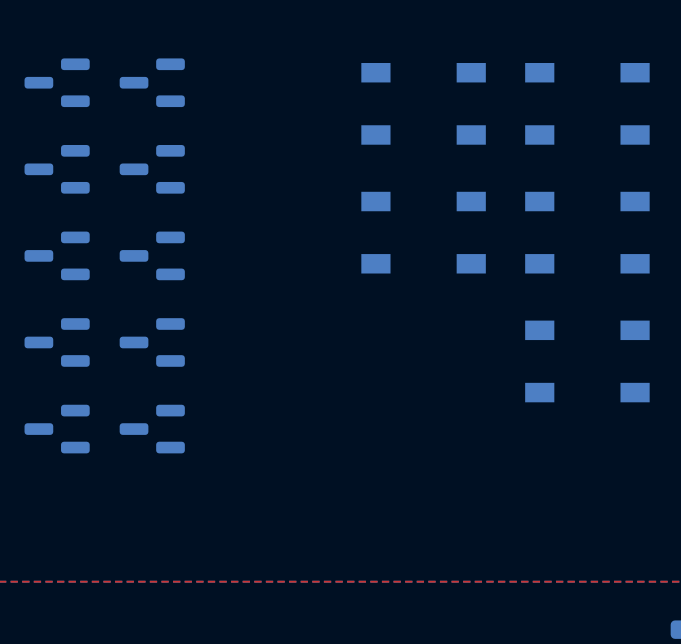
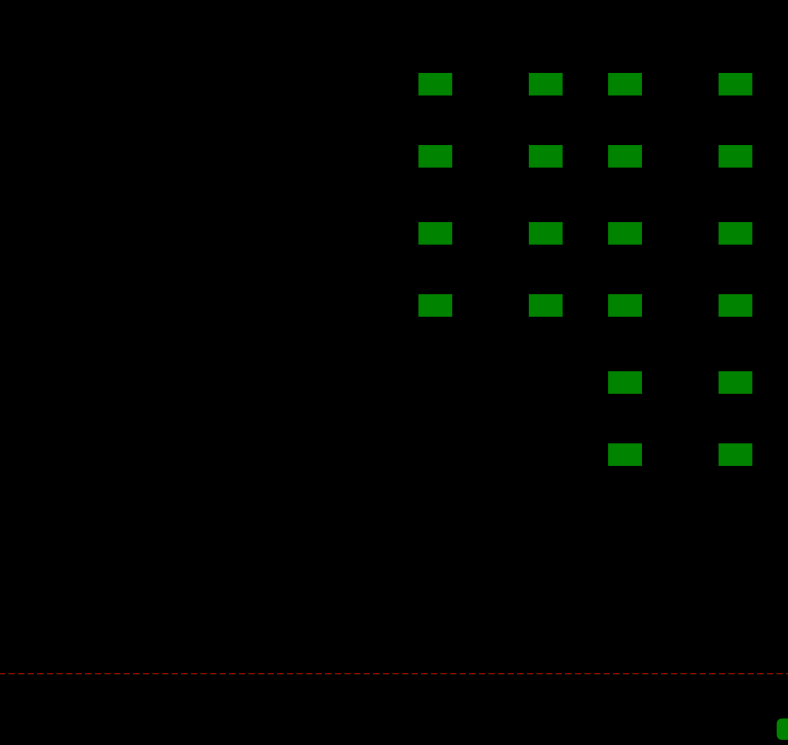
part: (57, 82) -> none
part: (152, 82) -> none
part: (57, 169) -> none
part: (152, 169) -> none
part: (57, 255) -> none
part: (152, 255) -> none
part: (57, 342) -> none
part: (152, 342) -> none
part: (57, 429) -> none
part: (152, 429) -> none

